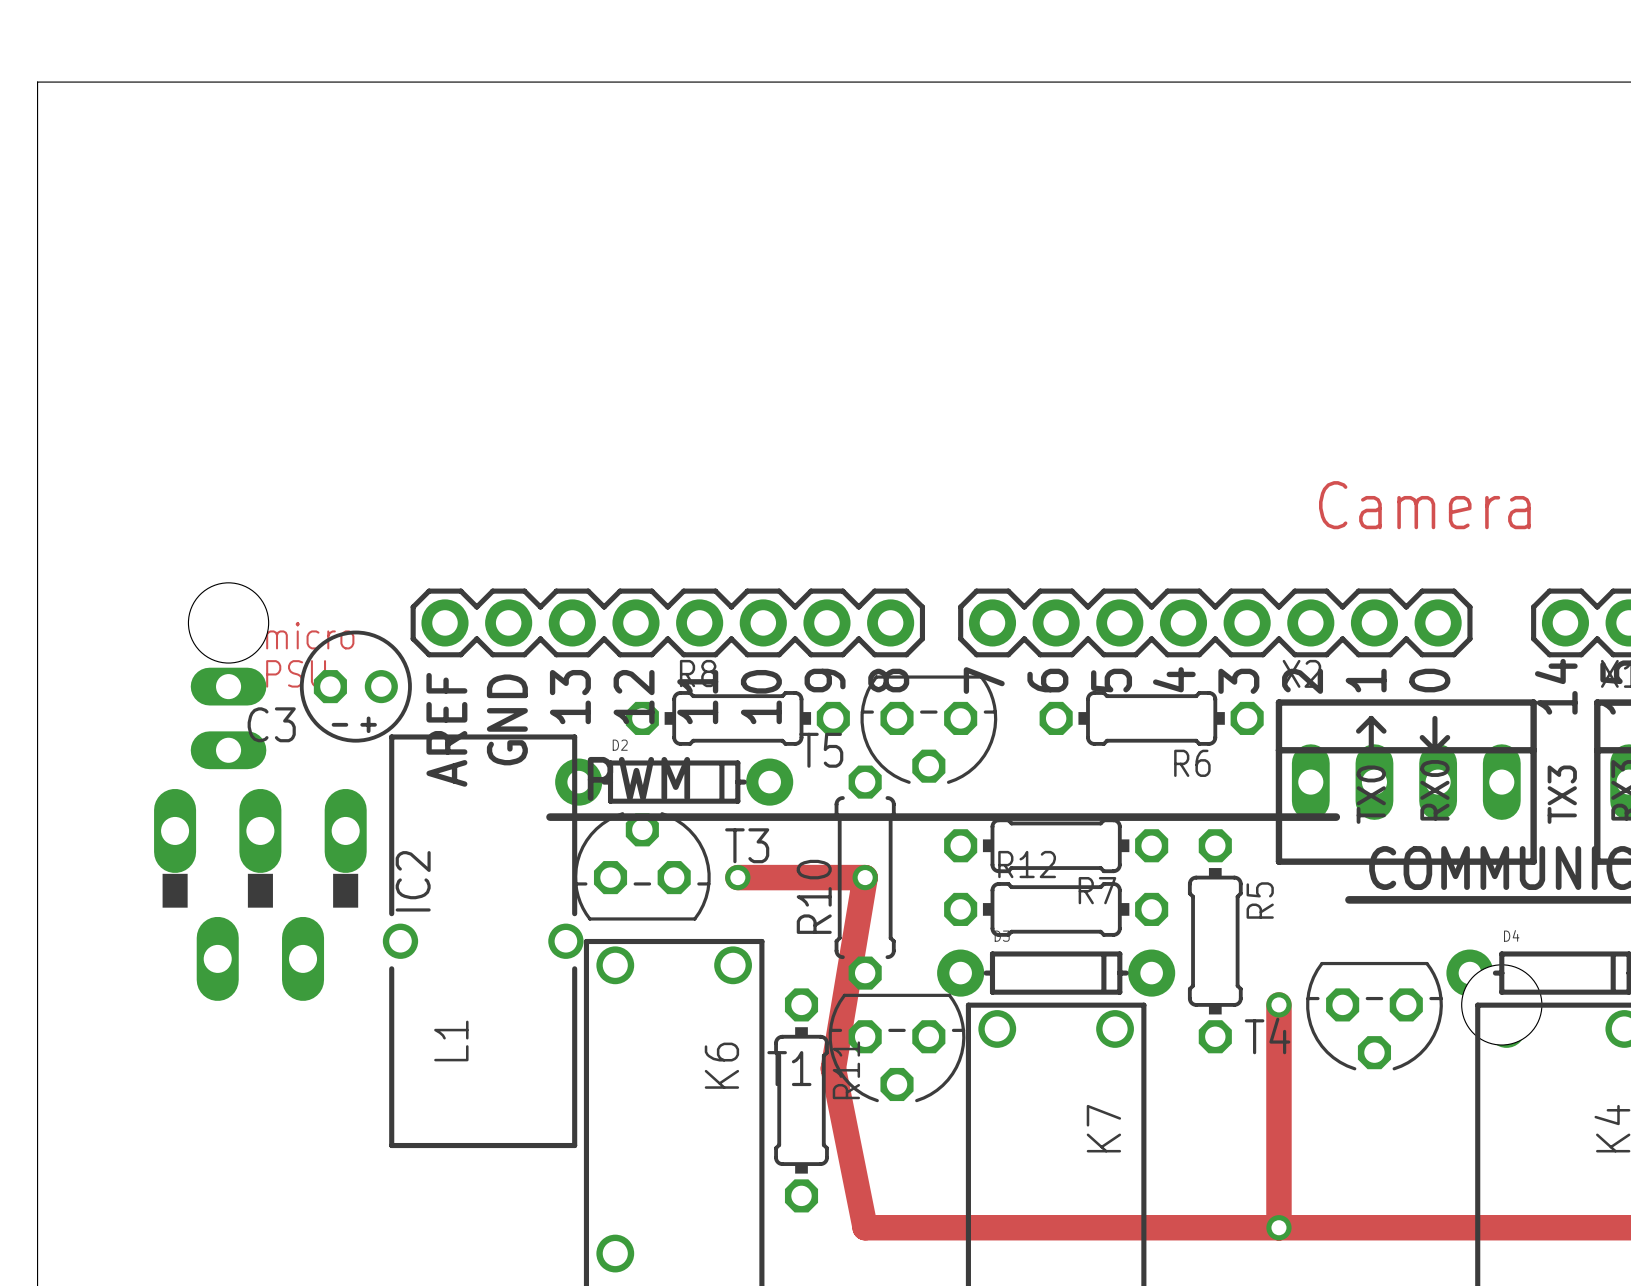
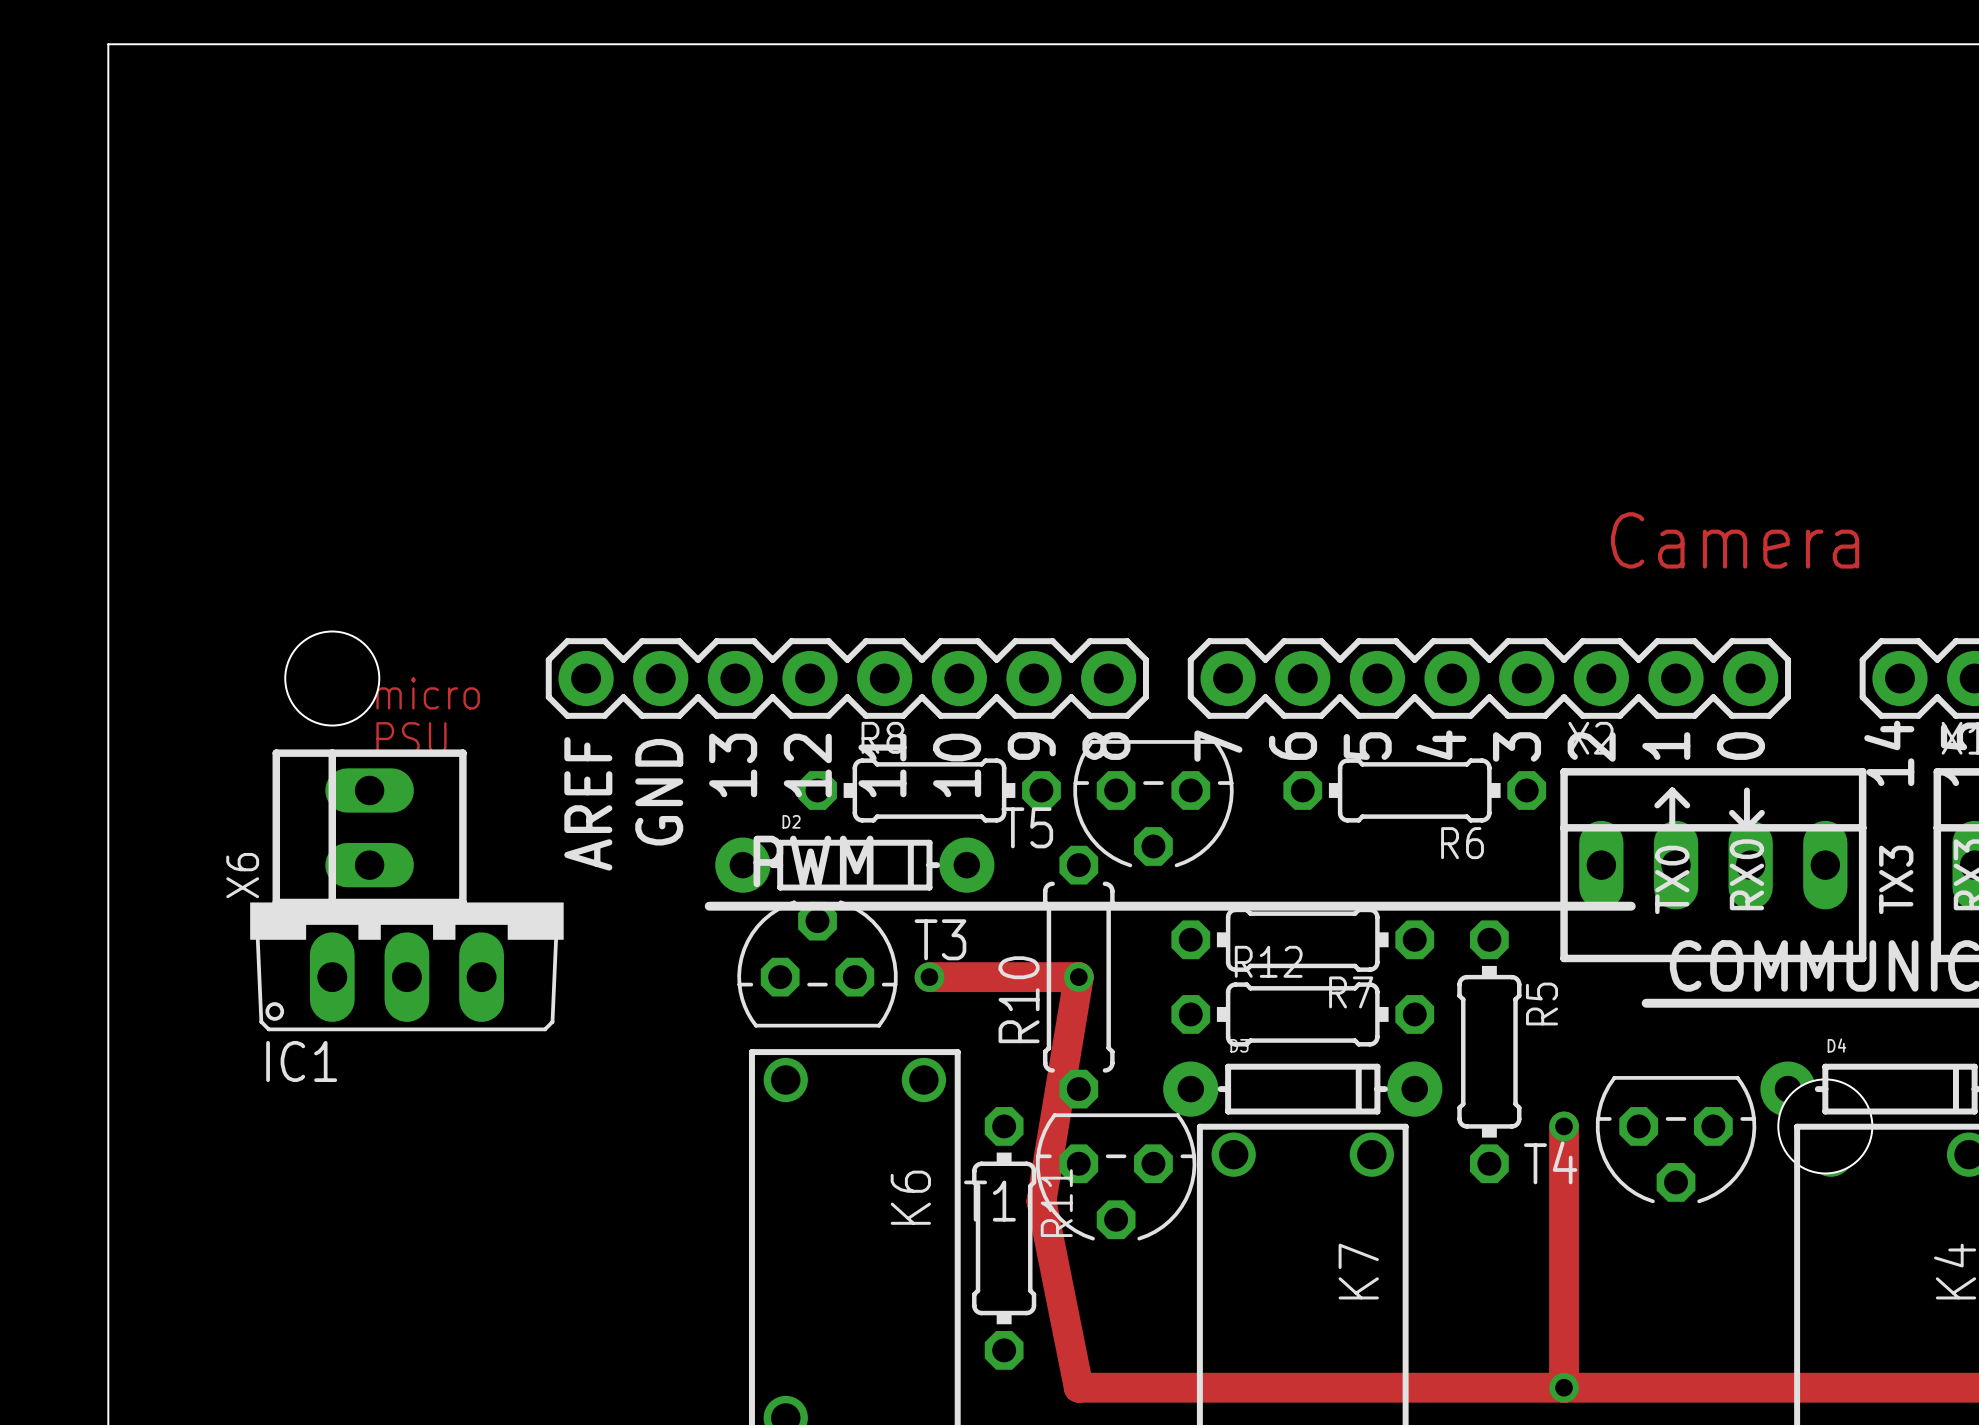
C3: (355, 686) -> none
part: (228, 718) -> none
X6: none -> (369, 827)
IC1: none -> (406, 966)
IC2: (260, 894) -> none
L1: (483, 941) -> none

